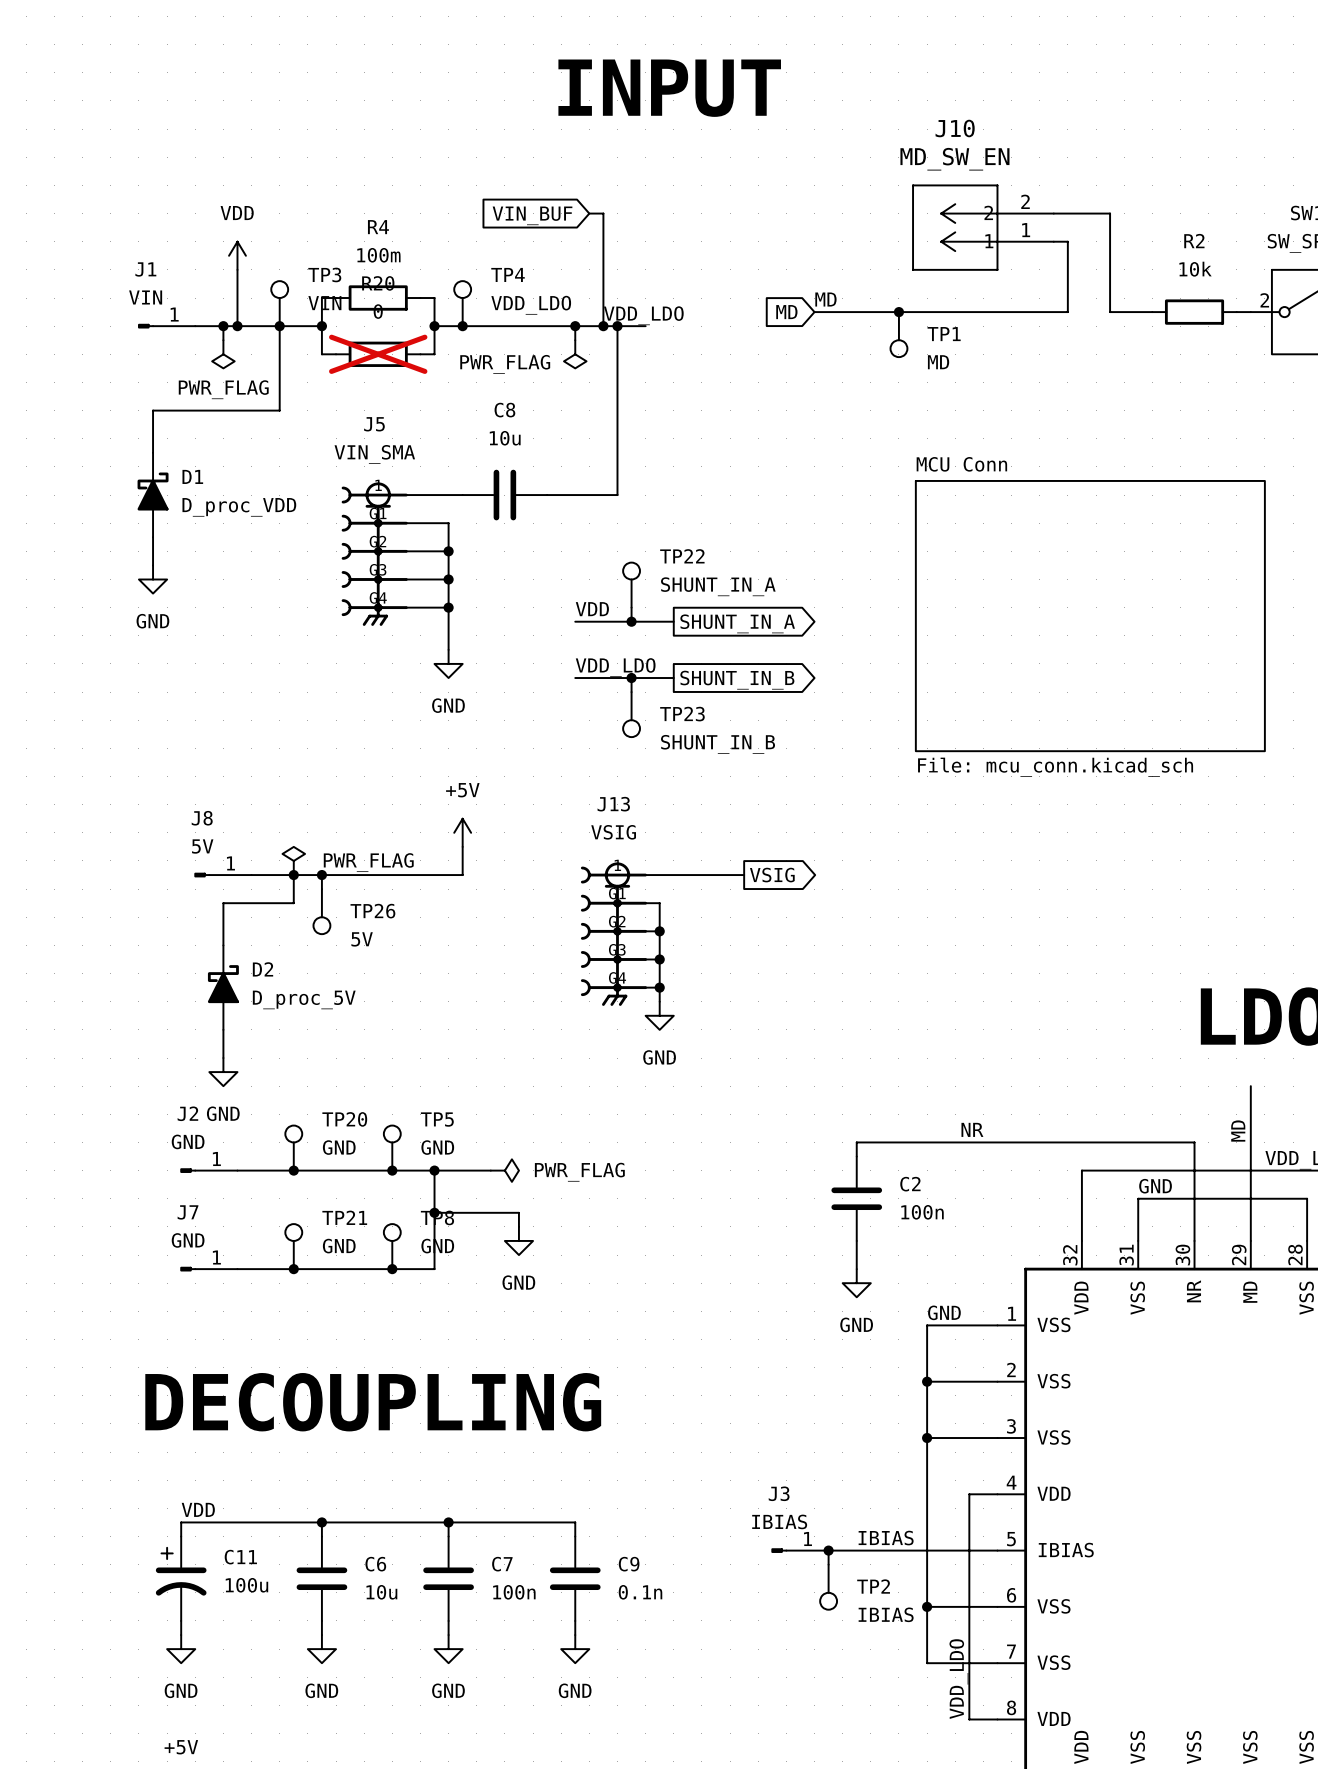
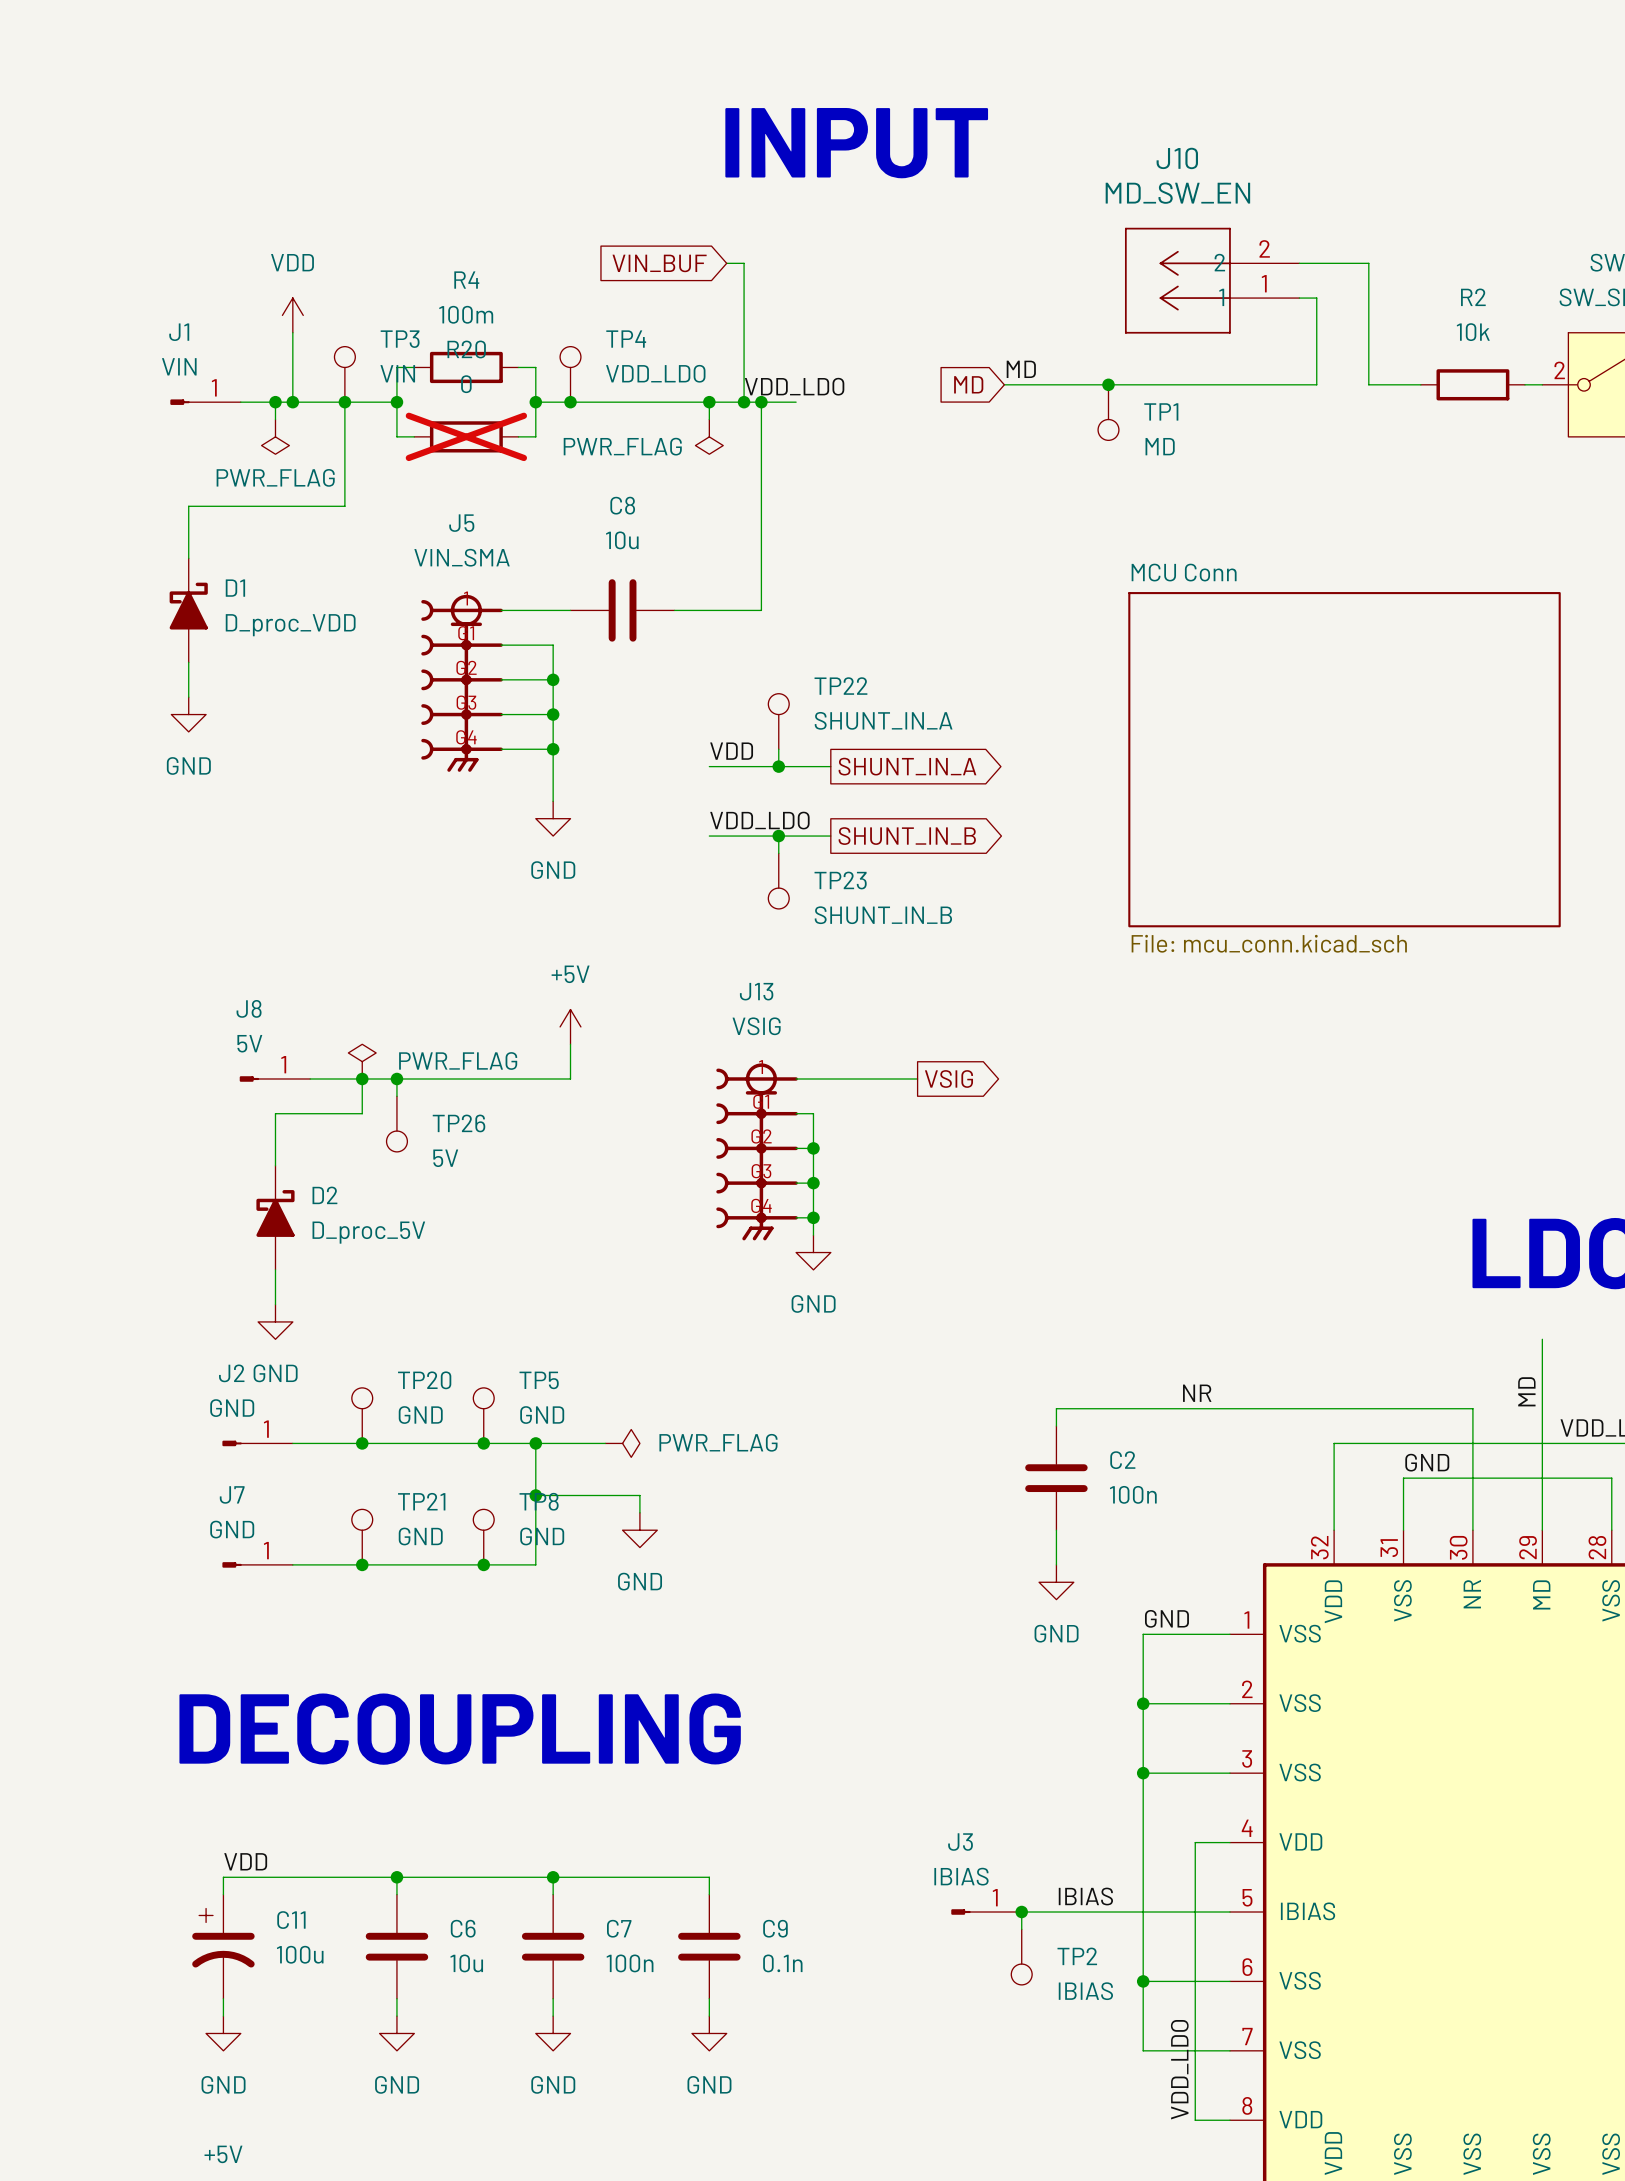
text position: INPUT (669, 88) -> INPUT (856, 143)

